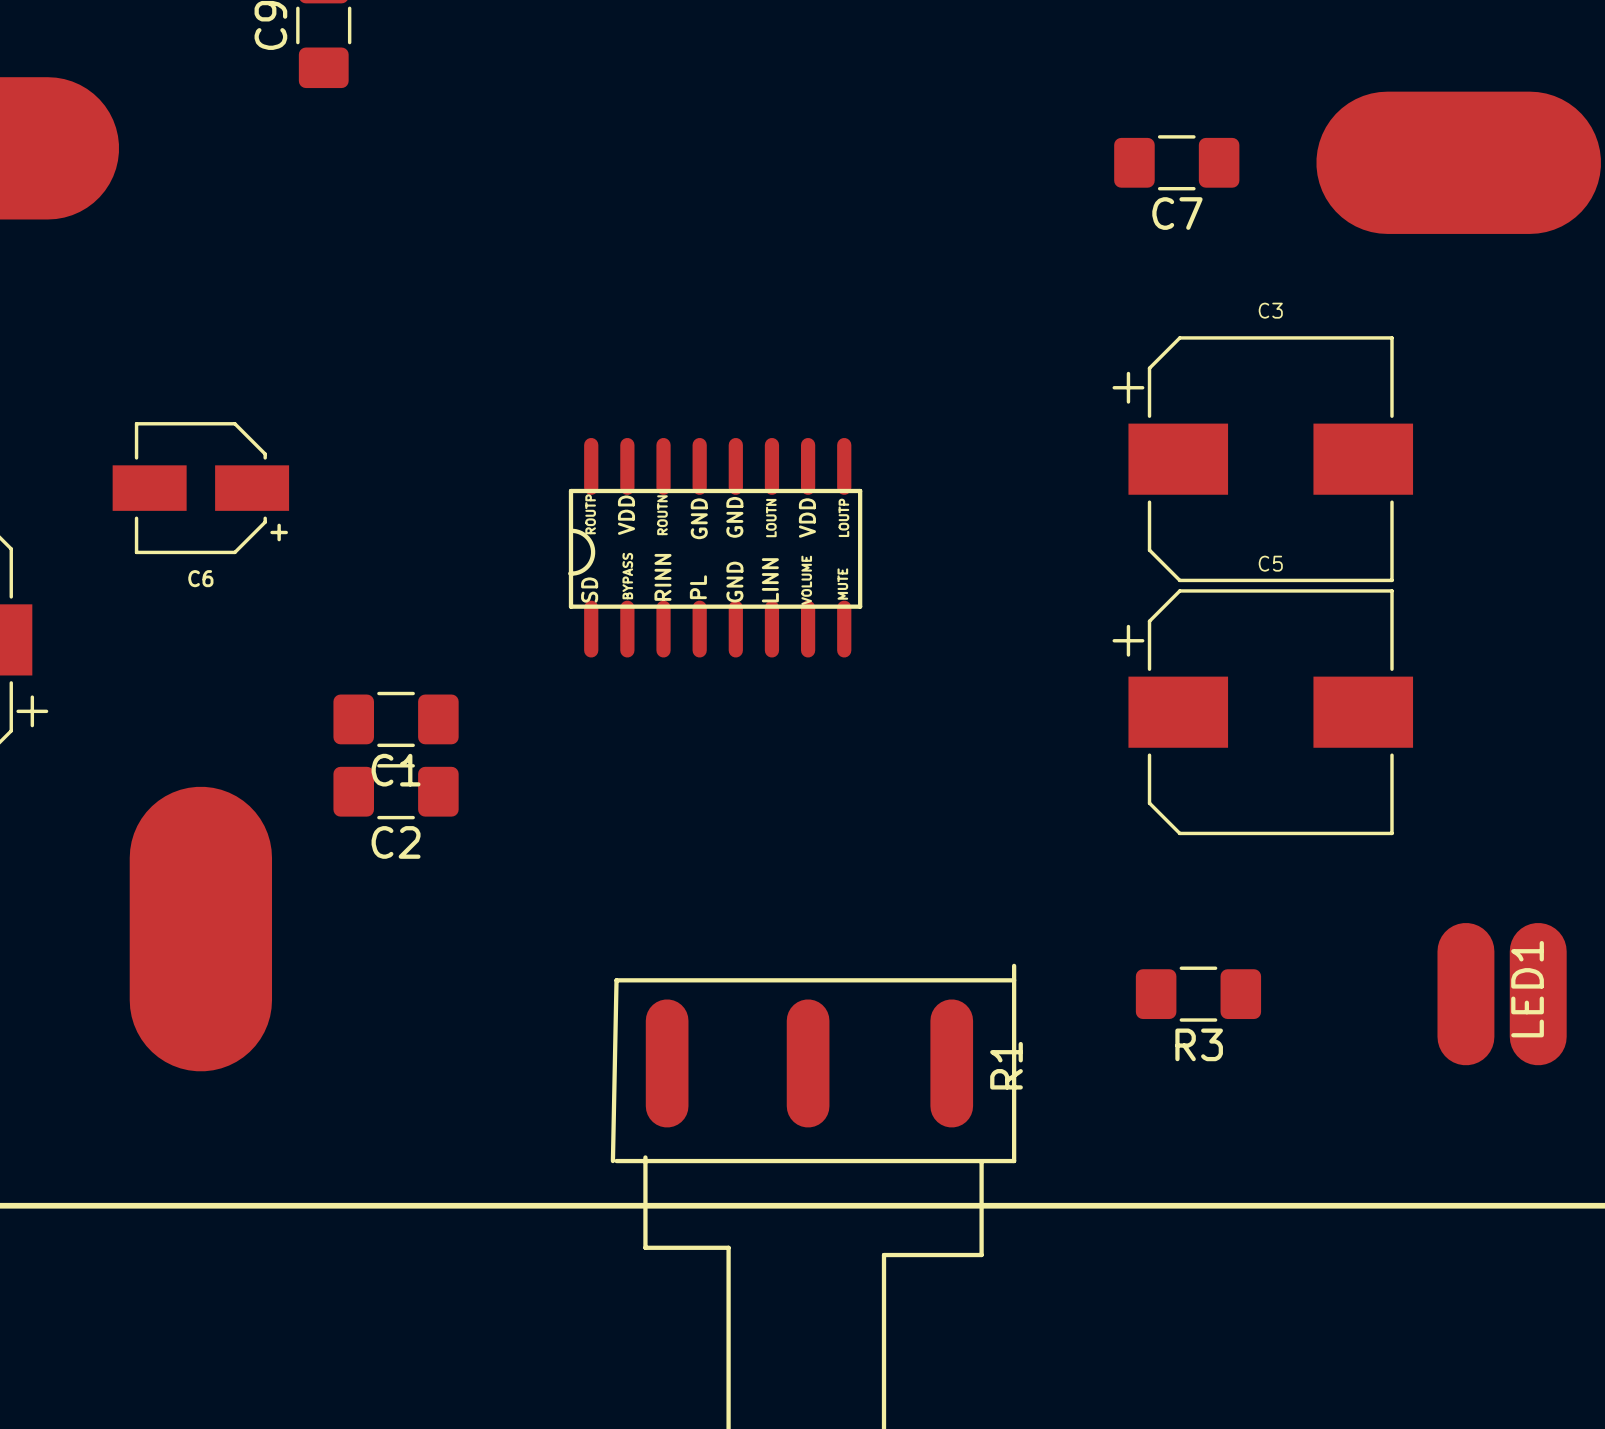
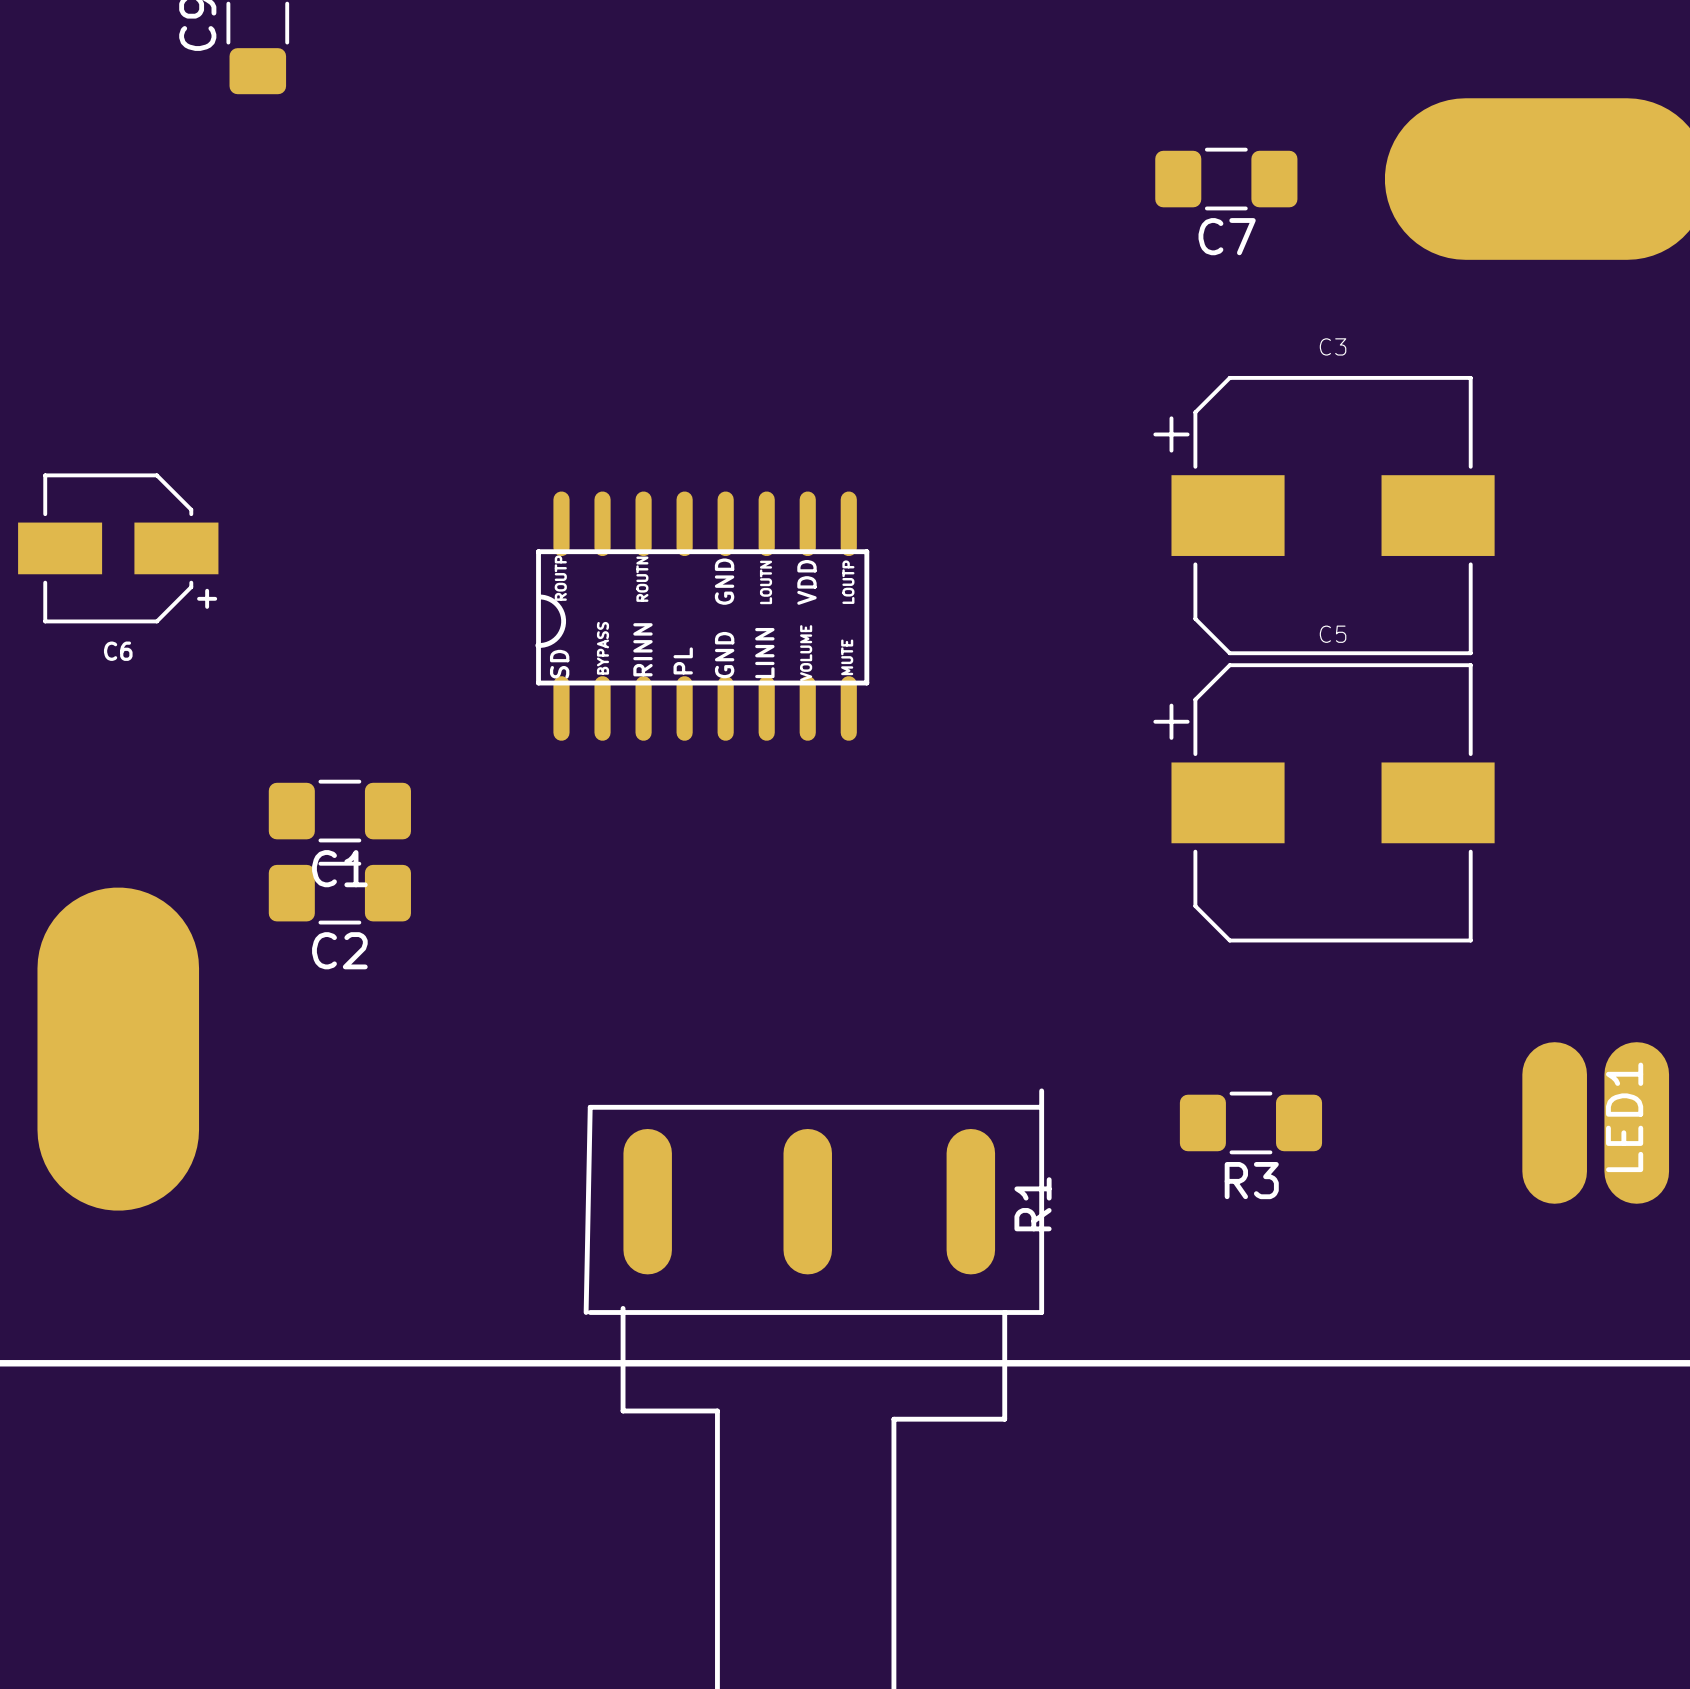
part text: VDD (626, 515) -> none
part text: GND (699, 518) -> none

